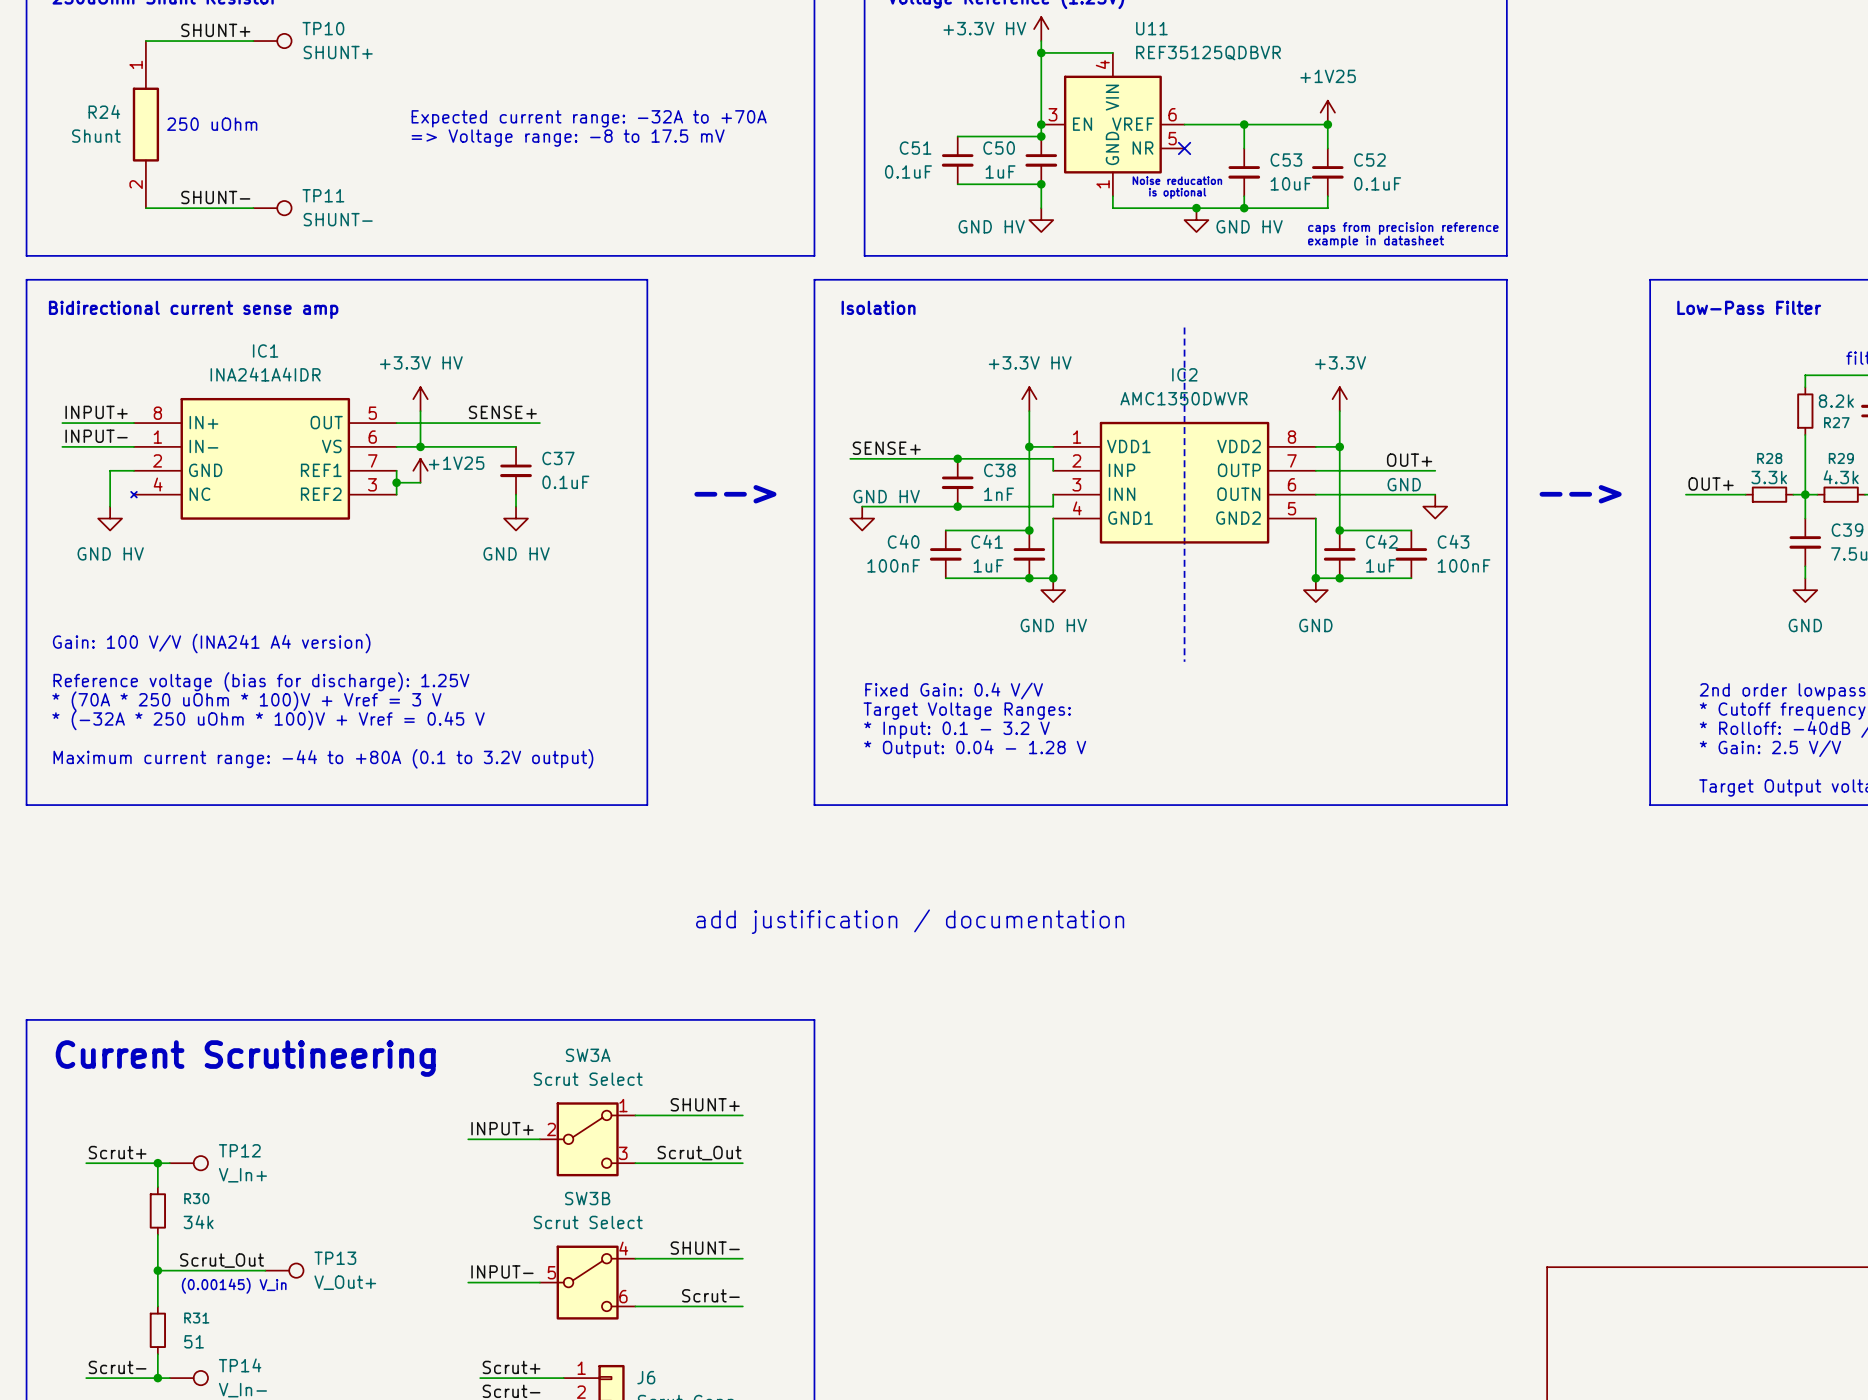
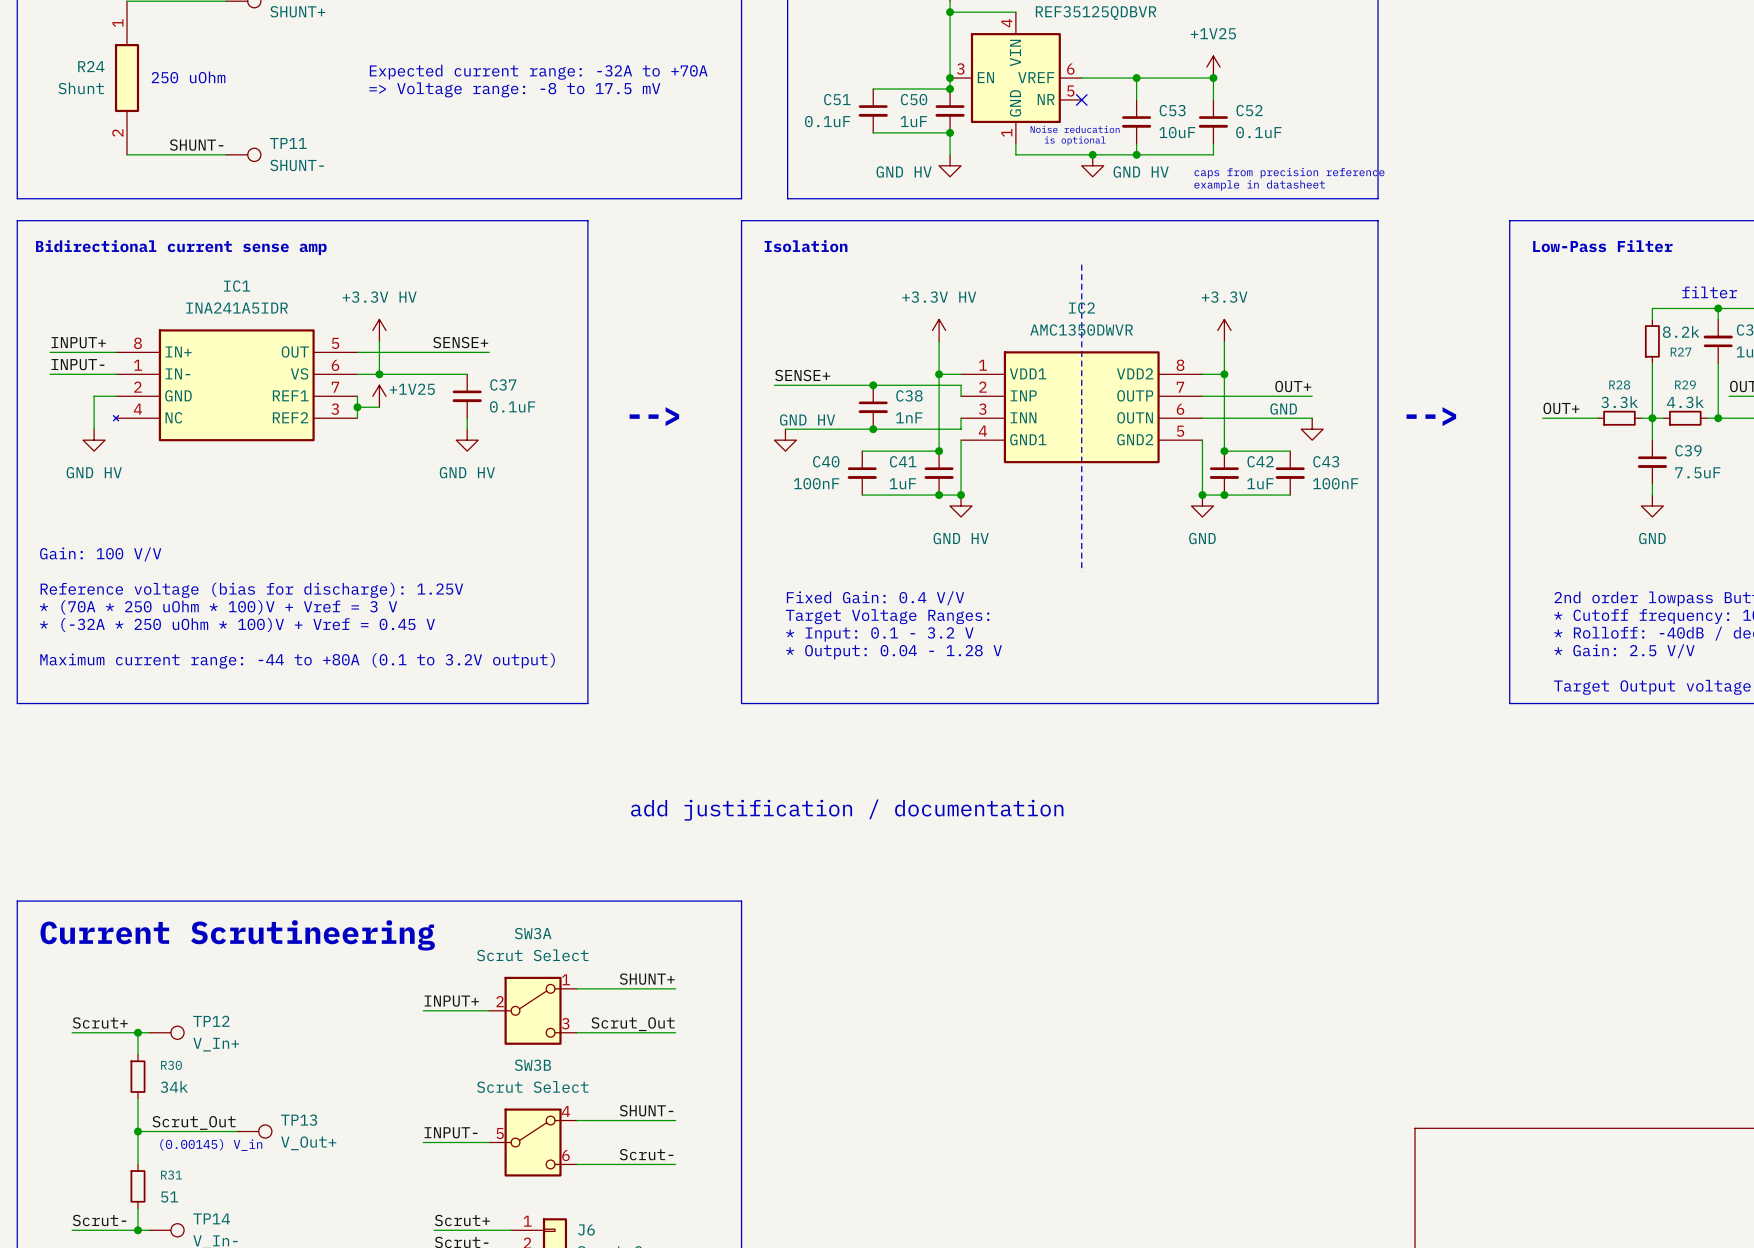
IC1 value: INA241A4IDR (265, 374) -> INA241A5IDR (237, 308)
text: Gain: 100 V/V (INA241 A4 version) (211, 643) -> Gain: 100 V/V (100, 554)

